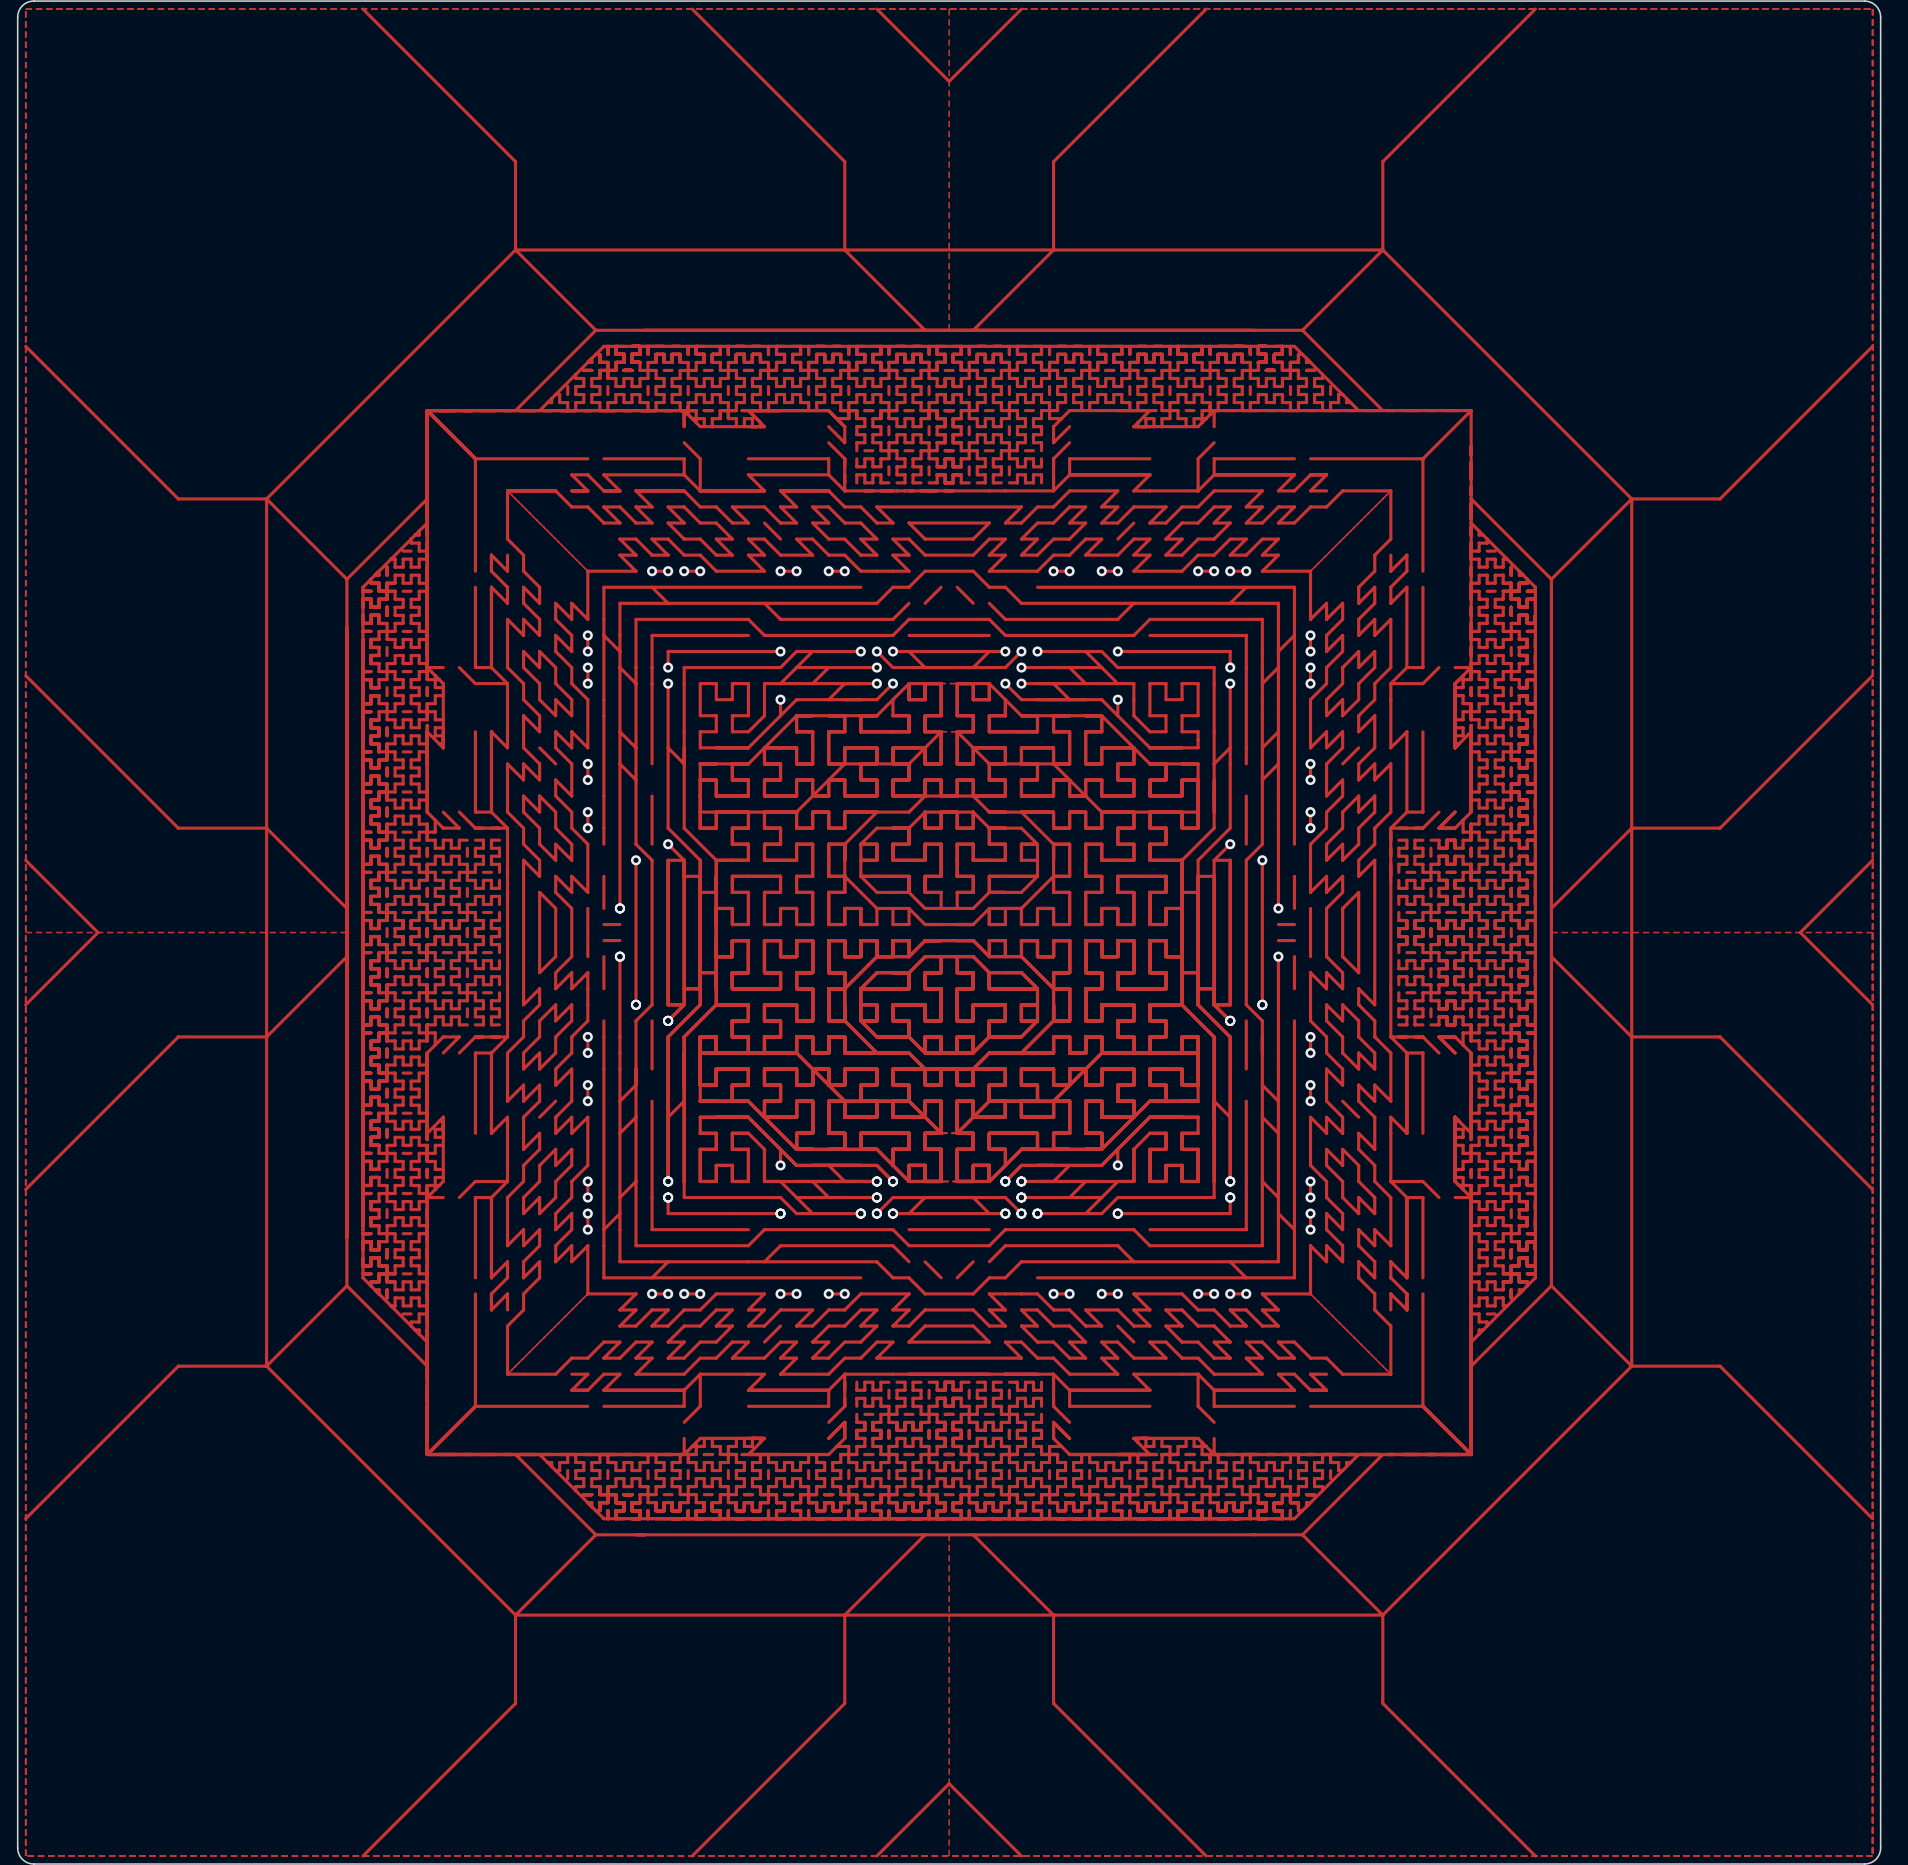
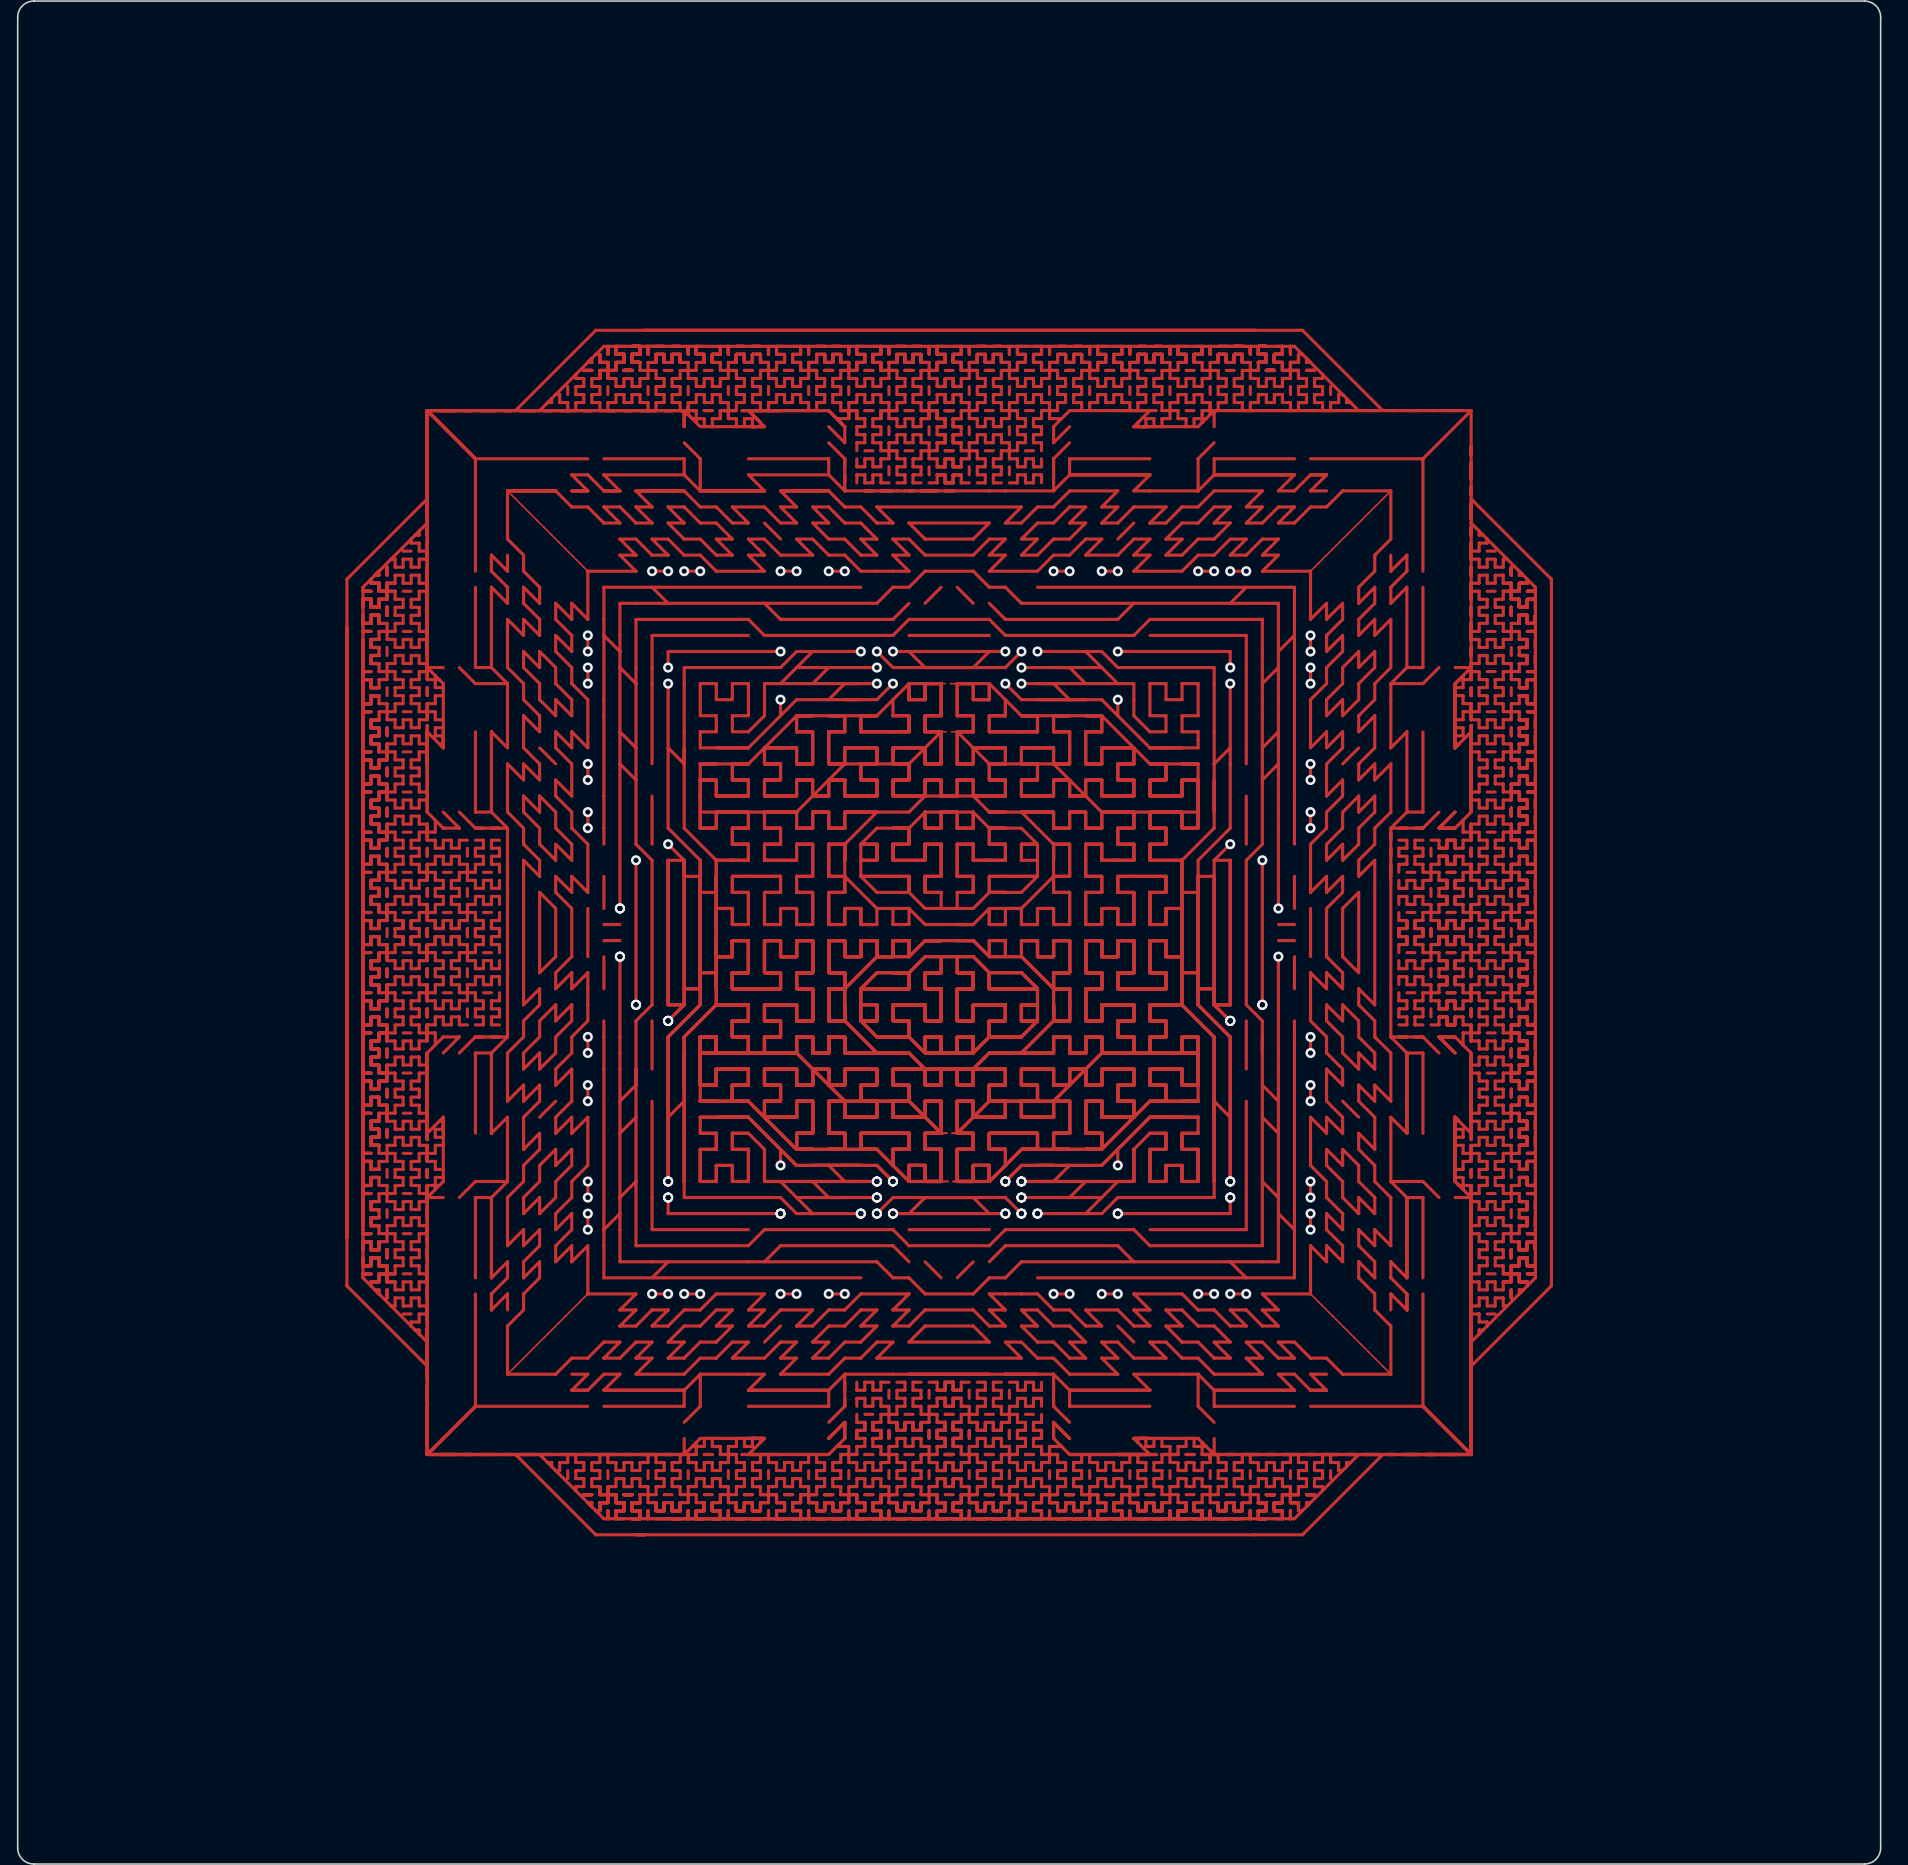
zone outline: (25, 9) (25, 1855) (1872, 1855) (1872, 9) (25, 9) -> none
track: (362, 9) (515, 161) (515, 249) -> none
track: (692, 9) (844, 161) (844, 249) (925, 330) -> none
track: (876, 9) (949, 81) (1021, 9) -> none
zone outline: (949, 9) (949, 330) -> none
track: (1206, 9) (1053, 161) (1053, 249) (973, 330) -> none
track: (1535, 9) (1382, 161) (1382, 249) -> none
track: (515, 249) (1382, 249) -> none
track: (515, 249) (595, 330) -> none
track: (515, 249) (266, 498) -> none
track: (1382, 249) (1631, 498) -> none
track: (1382, 249) (1302, 330) -> none
track: (25, 346) (178, 498) (266, 498) -> none
track: (1872, 346) (1720, 498) (1631, 498) -> none
track: (266, 498) (346, 579) -> none
track: (266, 498) (266, 1366) -> none
track: (1631, 498) (1551, 579) -> none
track: (1631, 498) (1631, 1366) -> none
track: (25, 675) (178, 828) (266, 828) (346, 908) -> none
track: (1872, 675) (1720, 828) (1631, 828) (1551, 908) -> none
track: (25, 860) (97, 932) (25, 1004) -> none
track: (1872, 860) (1800, 932) (1872, 1004) -> none
zone outline: (25, 932) (346, 932) -> none
zone outline: (1551, 932) (1872, 932) -> none
track: (346, 956) (266, 1036) (178, 1036) (25, 1189) -> none
track: (1551, 956) (1631, 1036) (1720, 1036) (1872, 1189) -> none
track: (346, 1285) (266, 1366) -> none
track: (1551, 1285) (1631, 1366) -> none
track: (266, 1366) (178, 1366) (25, 1518) -> none
track: (266, 1366) (515, 1615) -> none
track: (1631, 1366) (1720, 1366) (1872, 1518) -> none
track: (1631, 1366) (1382, 1615) -> none
track: (595, 1534) (515, 1615) -> none
track: (925, 1534) (844, 1615) (844, 1703) (692, 1855) -> none
zone outline: (949, 1534) (949, 1855) -> none
track: (973, 1534) (1053, 1615) (1053, 1703) (1206, 1855) -> none
track: (1302, 1534) (1382, 1615) -> none
track: (515, 1615) (1382, 1615) -> none
track: (515, 1615) (515, 1703) (362, 1855) -> none
track: (1382, 1615) (1382, 1703) (1535, 1855) -> none
track: (876, 1855) (949, 1783) (1021, 1855) -> none

